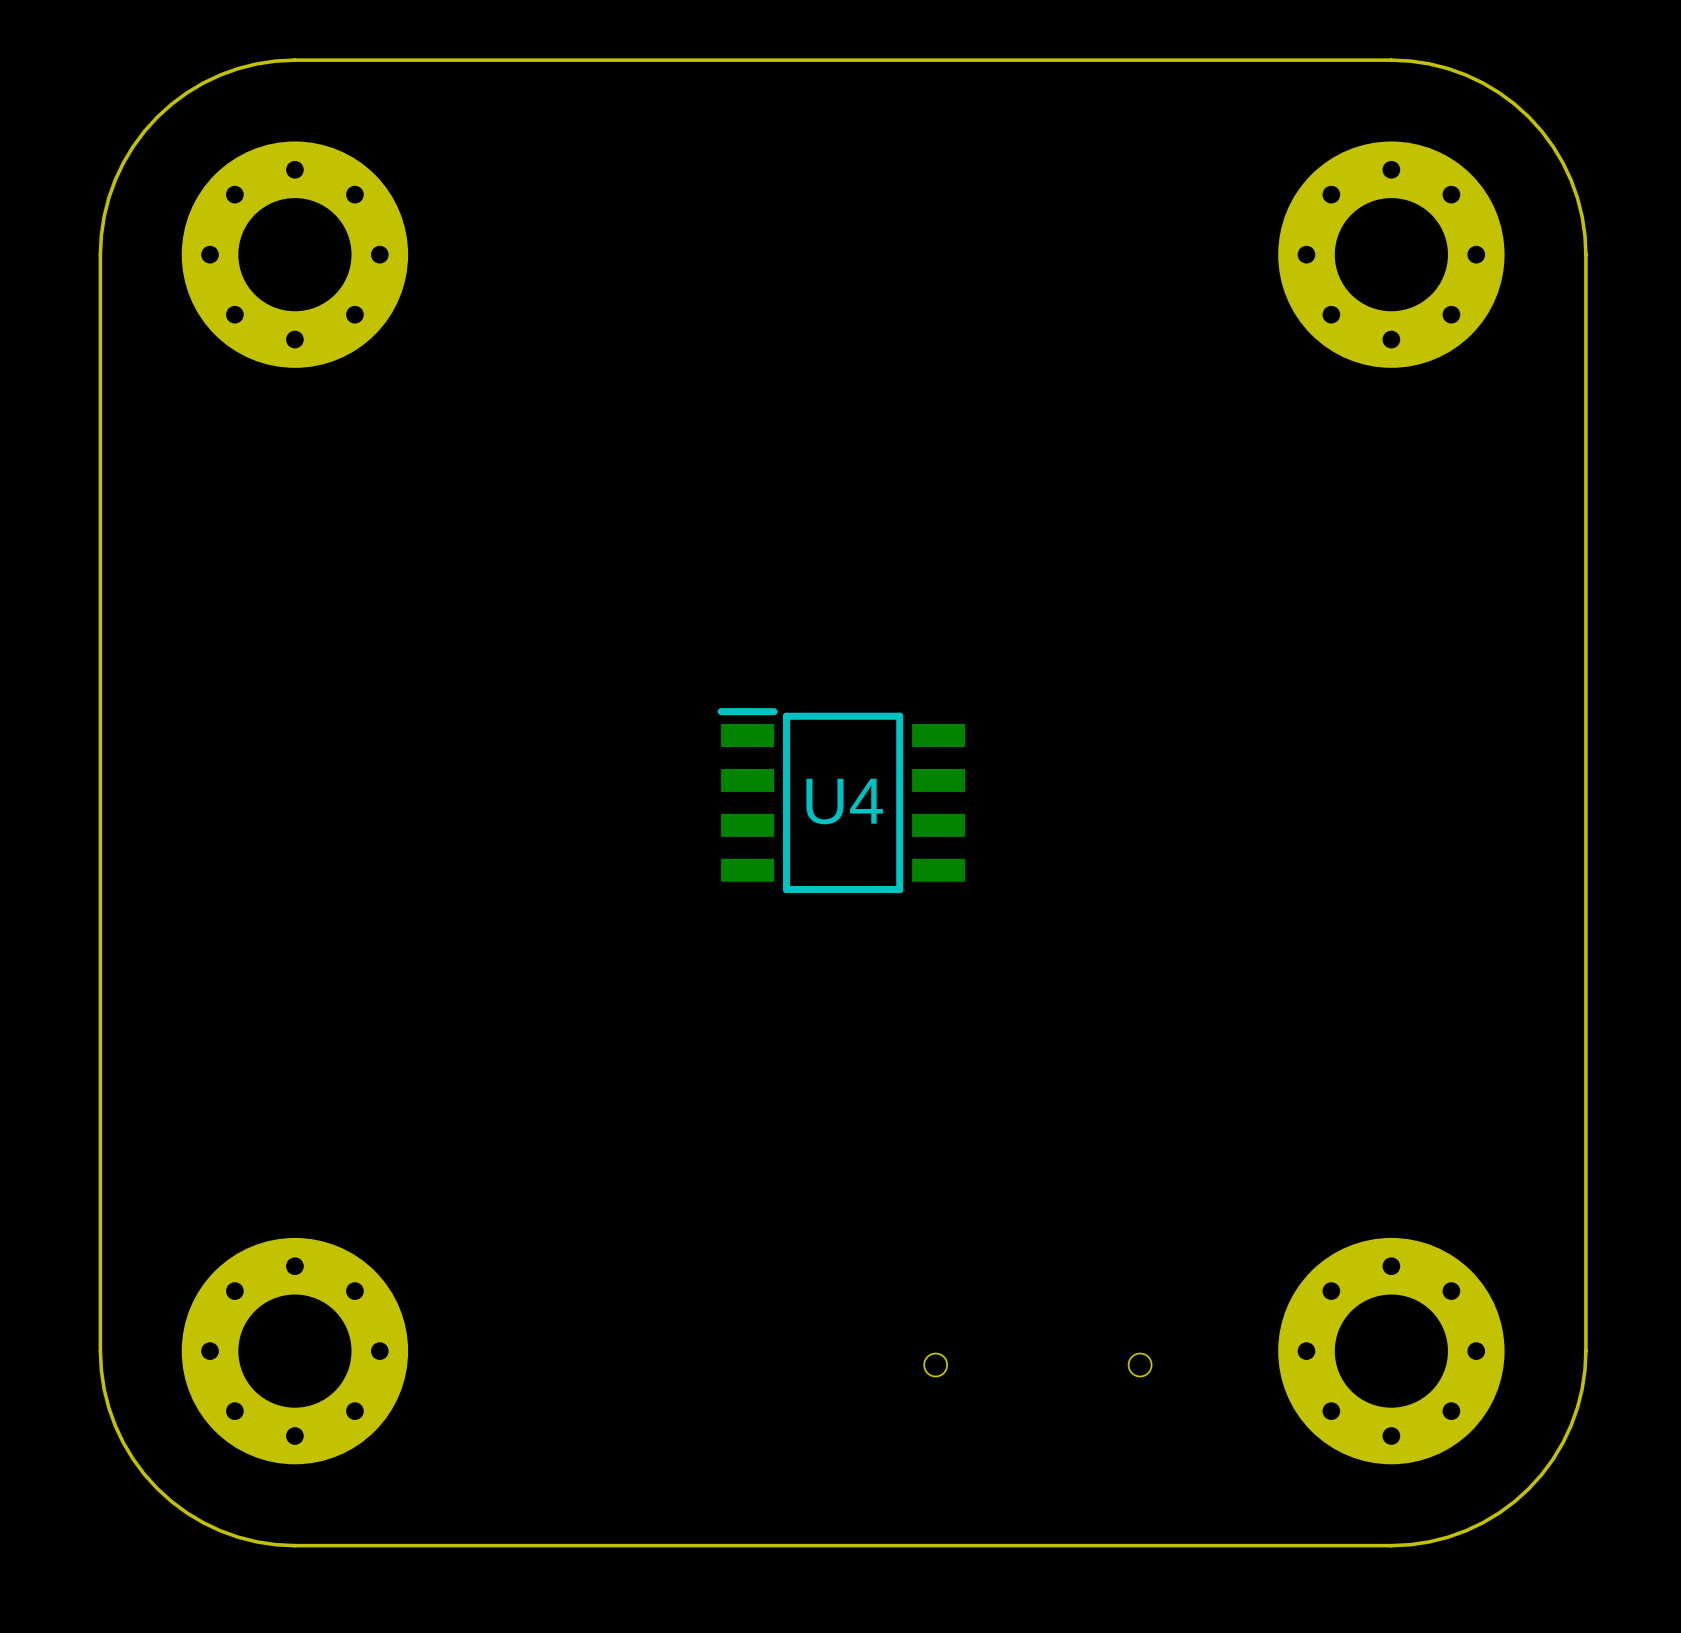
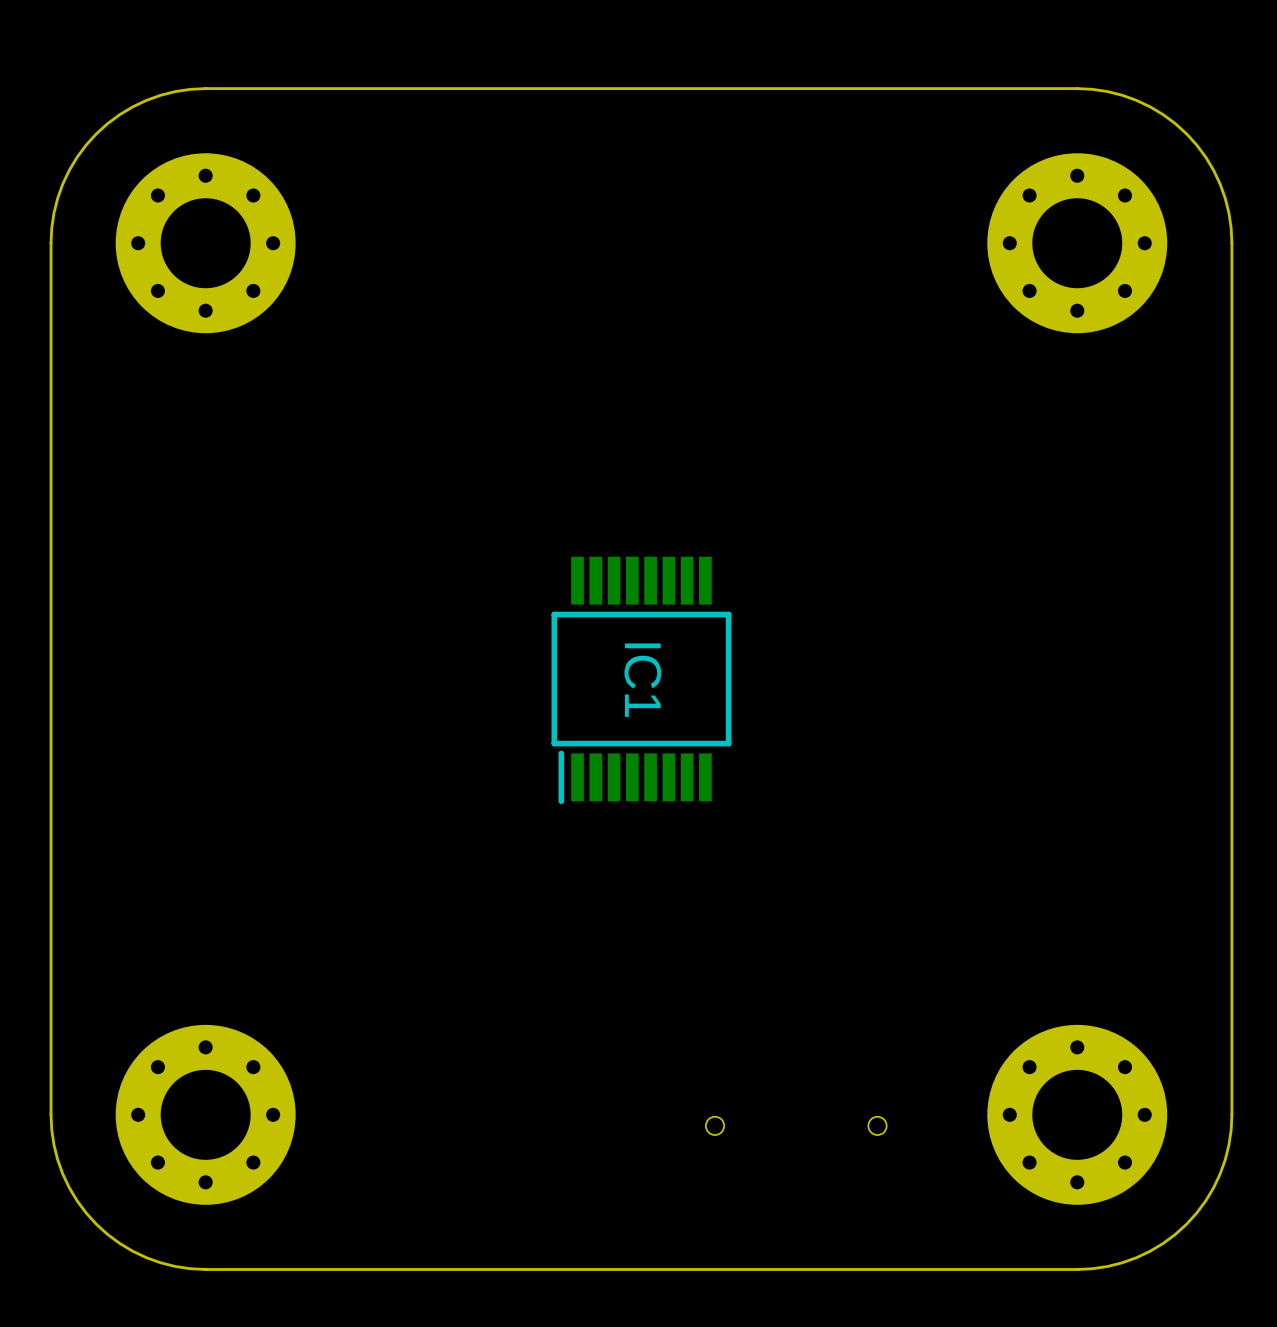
U4: (841, 800) -> none
IC1: none -> (641, 680)

